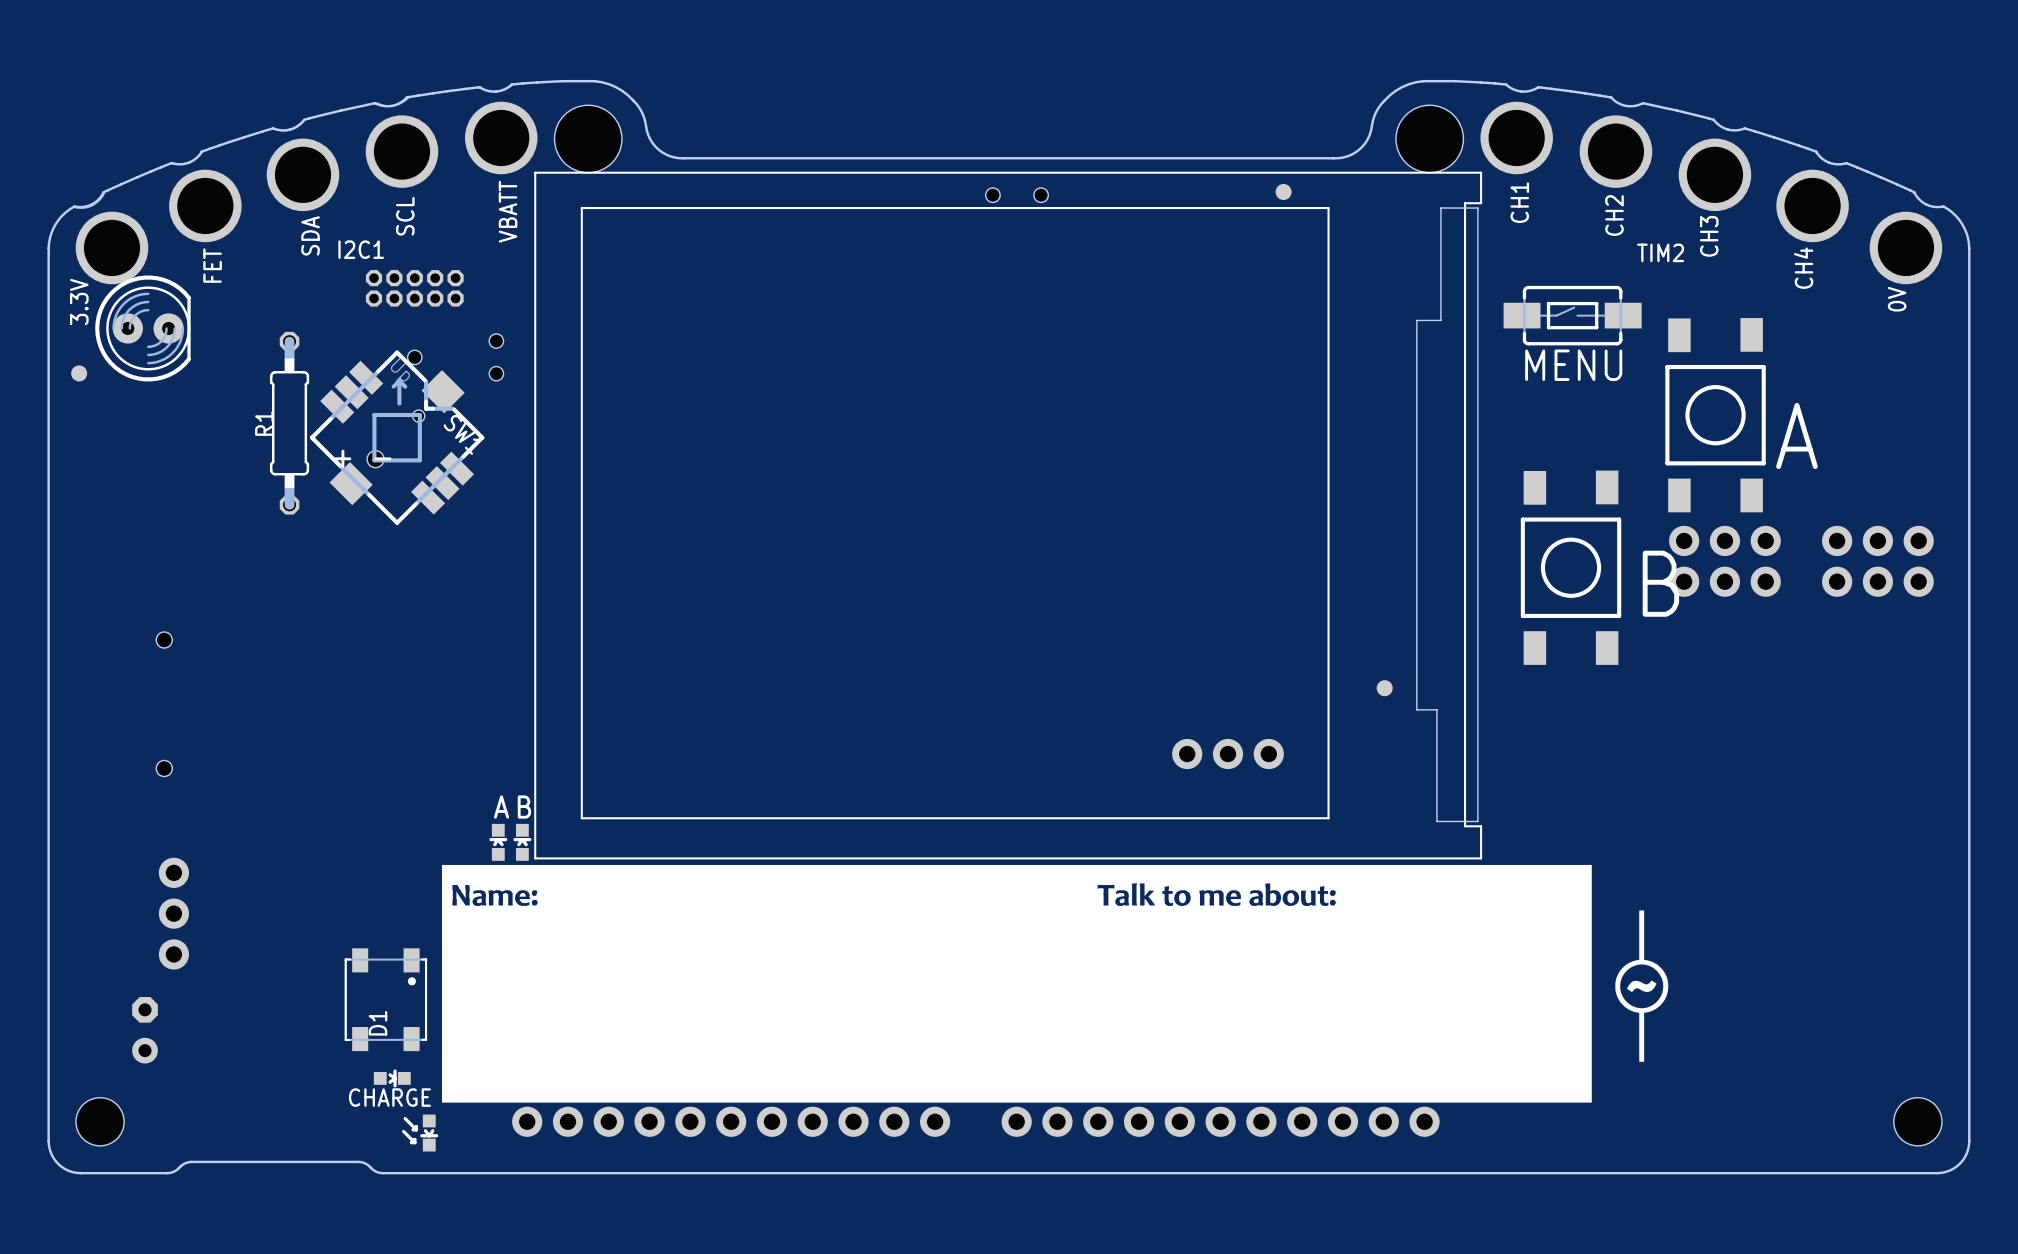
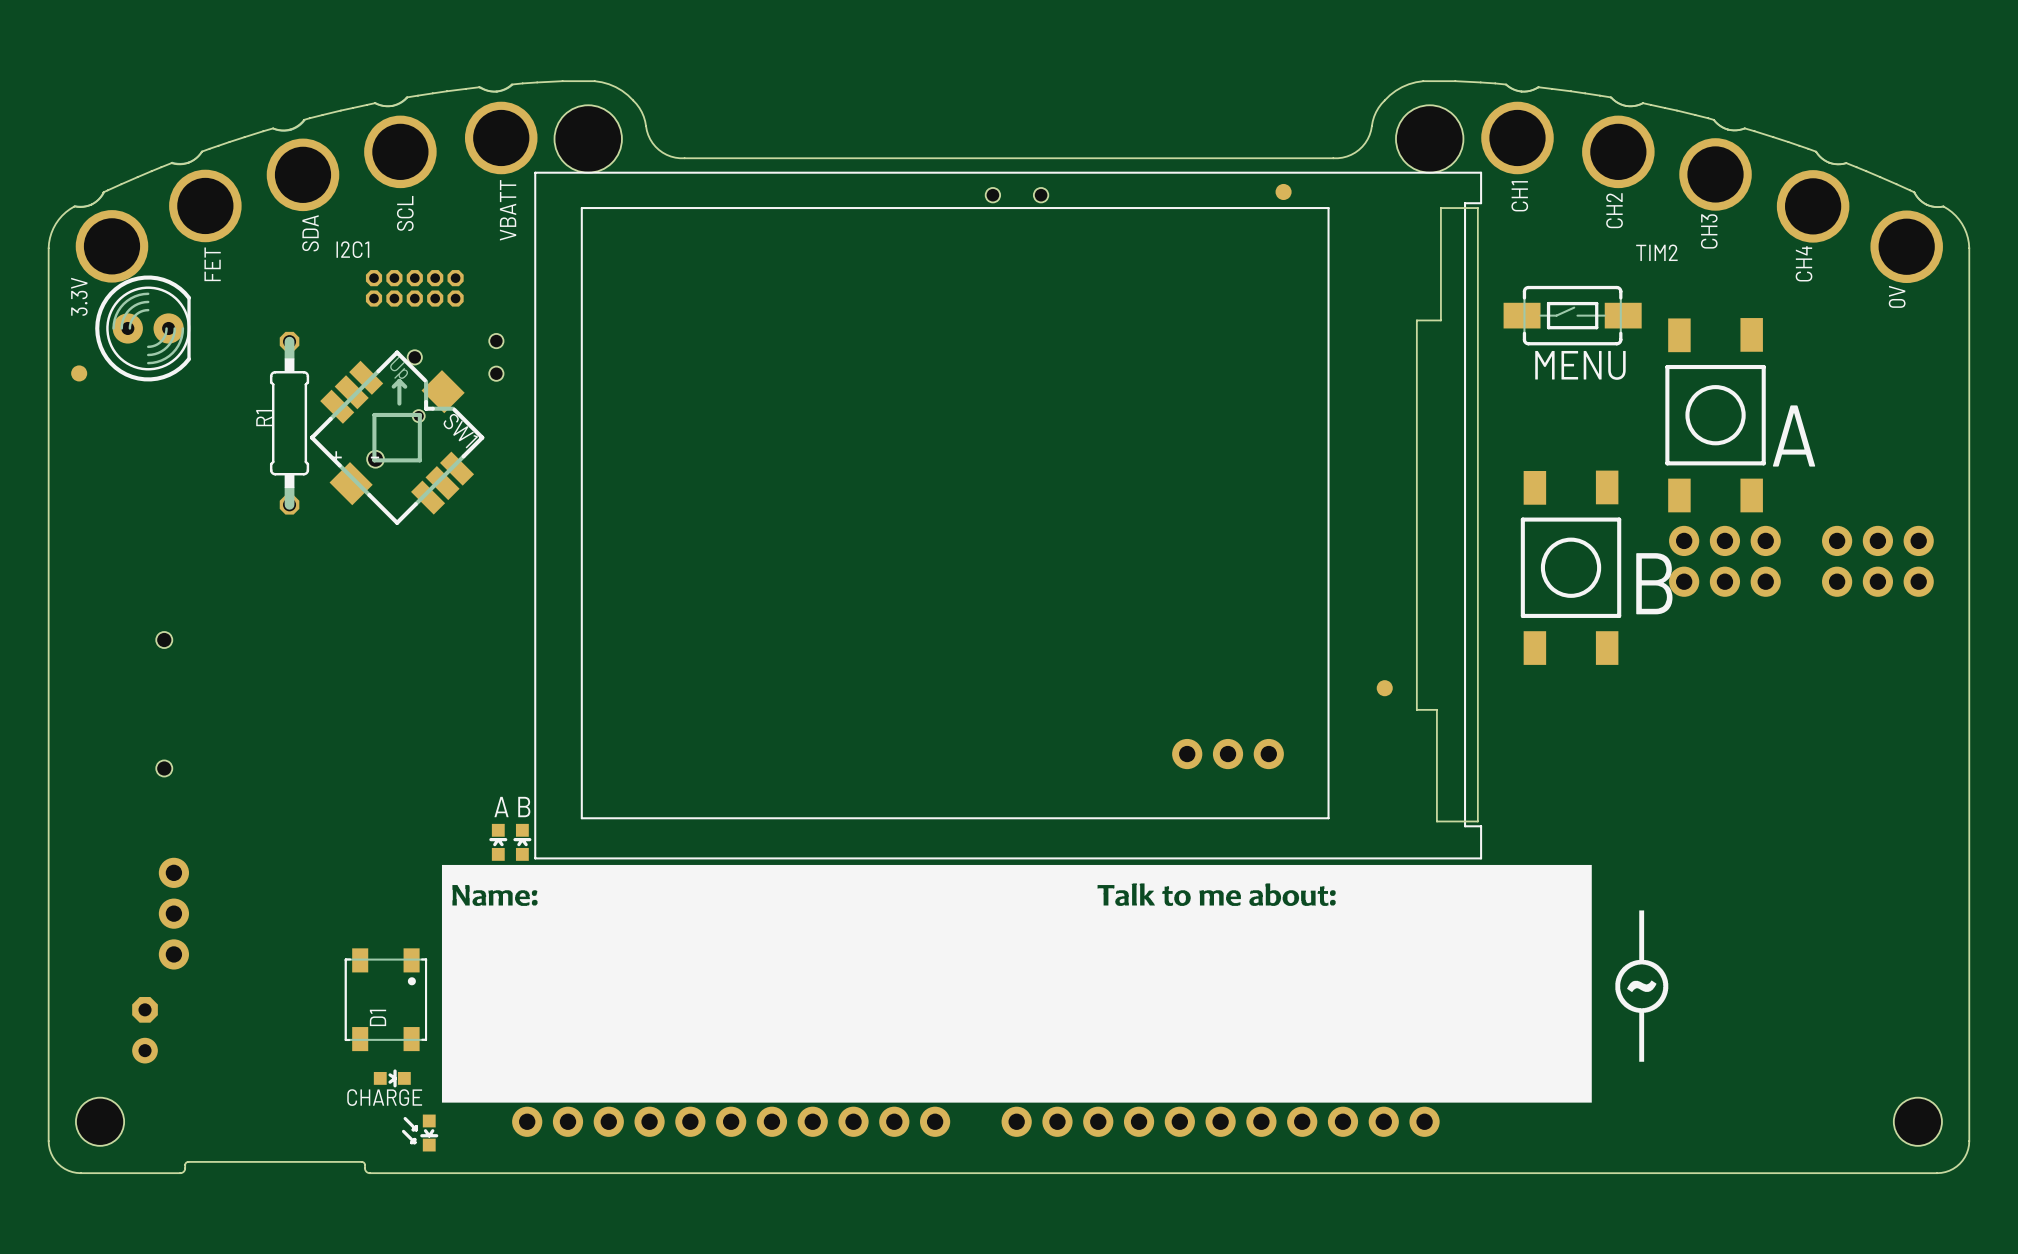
board edge: none -> (562, 81) (601, 82) (622, 90) (639, 107) (648, 135) (655, 146) (666, 154) (679, 158) (1337, 158) (1351, 154) (1362, 146) (1369, 135) (1374, 116) (1381, 104) (1395, 90) (1408, 84) (1423, 81) (1480, 82) (1506, 84) (1516, 90) (1524, 91) (1538, 87) (1610, 97) (1626, 105) (1642, 103) (1713, 119) (1727, 129) (1744, 128) (1754, 131) (1816, 151) (1829, 162) (1846, 163) (1866, 171) (1914, 192) (1926, 204) (1943, 206) (1952, 212) (1964, 228) (1969, 248) (1969, 1141) (1966, 1153) (1962, 1160) (1949, 1170) (1937, 1173) (369, 1173) (366, 1171) (364, 1163) (361, 1161) (188, 1161) (185, 1163) (184, 1170) (180, 1173) (80, 1173) (68, 1170) (61, 1166) (51, 1153) (48, 1141) (48, 248) (53, 228) (58, 219) (70, 209) (74, 206) (91, 204) (107, 190) (171, 163) (188, 162) (201, 151) (273, 128) (290, 129) (309, 118) (374, 103) (391, 105) (407, 97) (479, 87) (496, 91) (511, 84) (562, 81)
part: none -> (501, 129)
part: none -> (1517, 129)
part: none -> (400, 142)
part: none -> (1618, 142)
part: none -> (303, 165)
part: none -> (1715, 165)
part: none -> (205, 196)
part: none -> (1813, 197)
part: none -> (111, 237)
part: none -> (1907, 237)
part: (1008, 627) -> none

